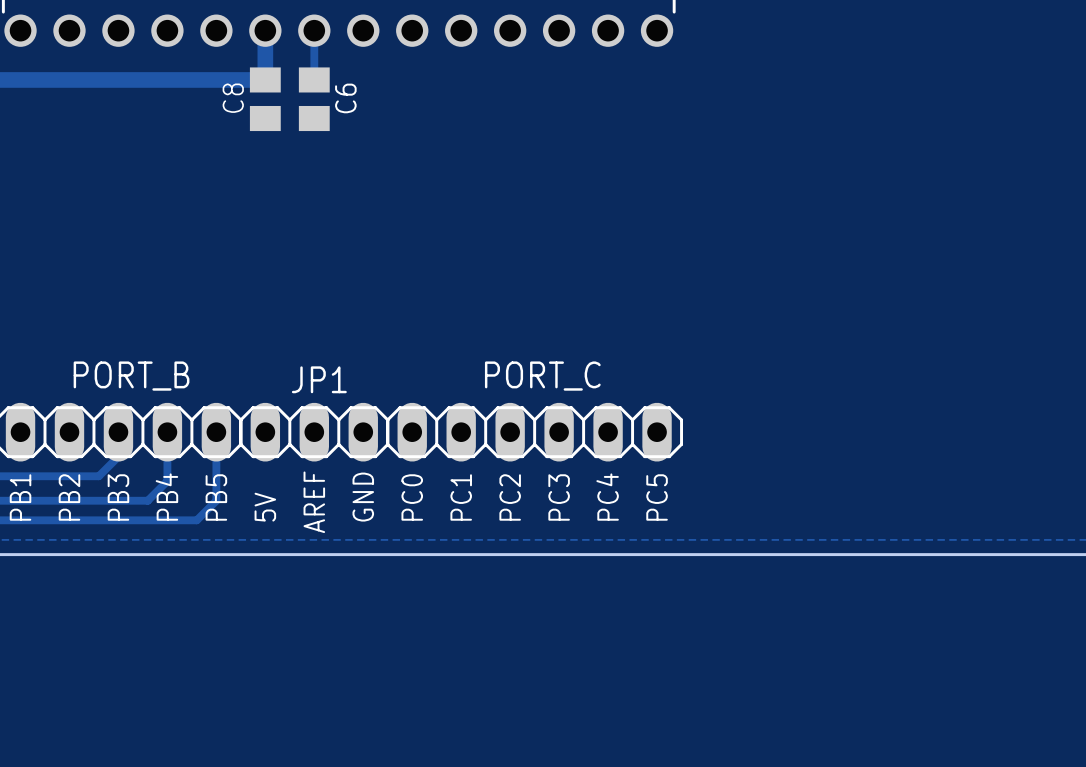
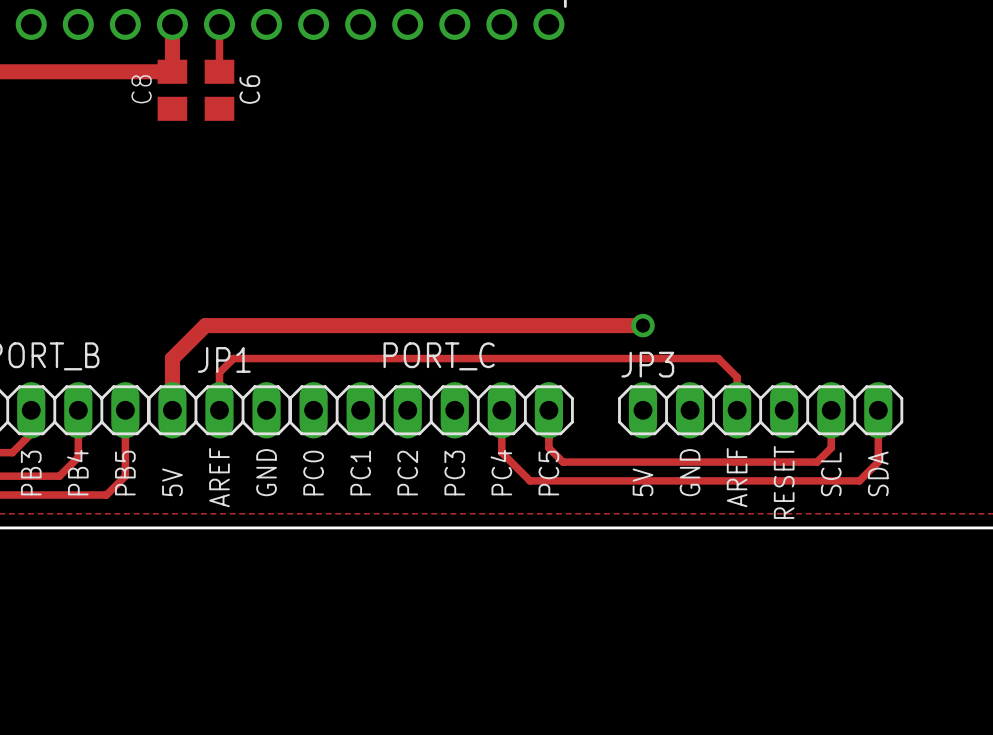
track: none -> (643, 325) (205, 325) (172, 358) (172, 410)
via: none -> (643, 325)
track: none -> (219, 410) (219, 372) (233, 358) (718, 358) (737, 377) (737, 410)
track: none -> (501, 410) (501, 452) (530, 480) (859, 480) (878, 462) (878, 410)
track: none -> (548, 410) (548, 447) (563, 462) (817, 462) (831, 447) (831, 410)
JP3: none -> (760, 410)
text: none -> GND (690, 472)
text: none -> SCL (831, 474)
text: none -> SDA (878, 473)
text: none -> AREF (737, 477)
text: none -> 5V (643, 482)
text: none -> RESET (784, 482)

